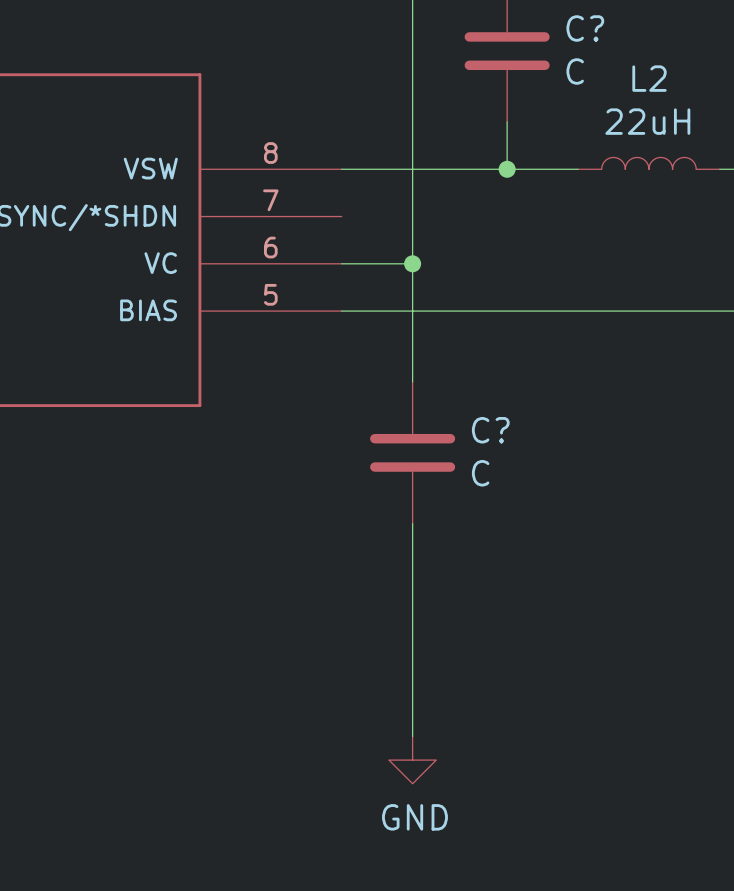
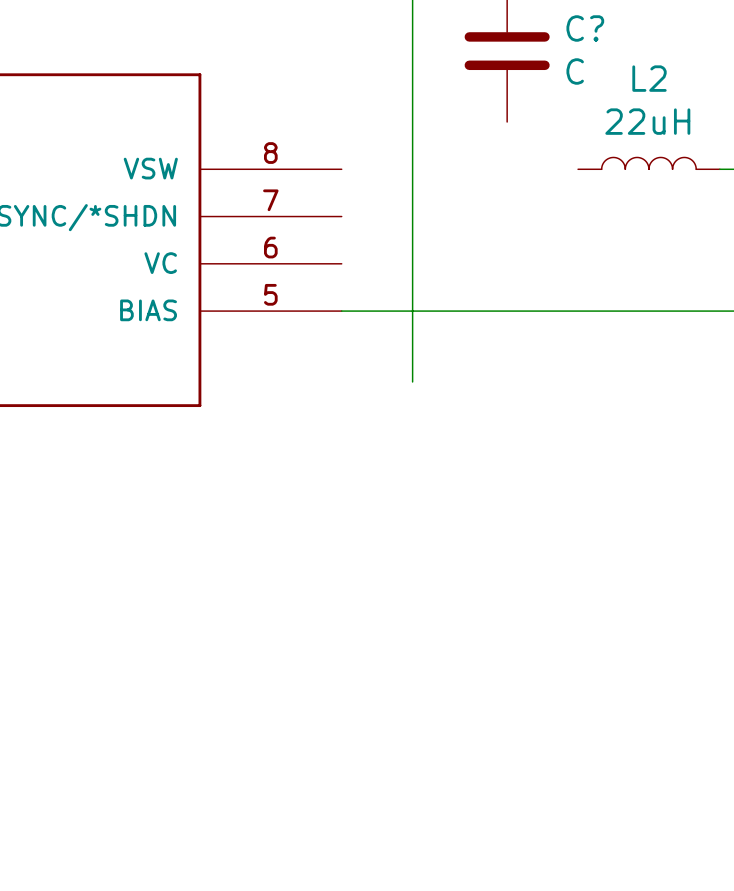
wire: (507, 122) (507, 169) -> none
wire: (341, 169) (578, 169) -> none
junction: (507, 169) -> none
wire: (341, 263) (412, 263) -> none
junction: (412, 263) -> none
C?: C (412, 452) -> none
wire: (412, 523) (412, 736) -> none
power symbol: GND (412, 760) -> none

